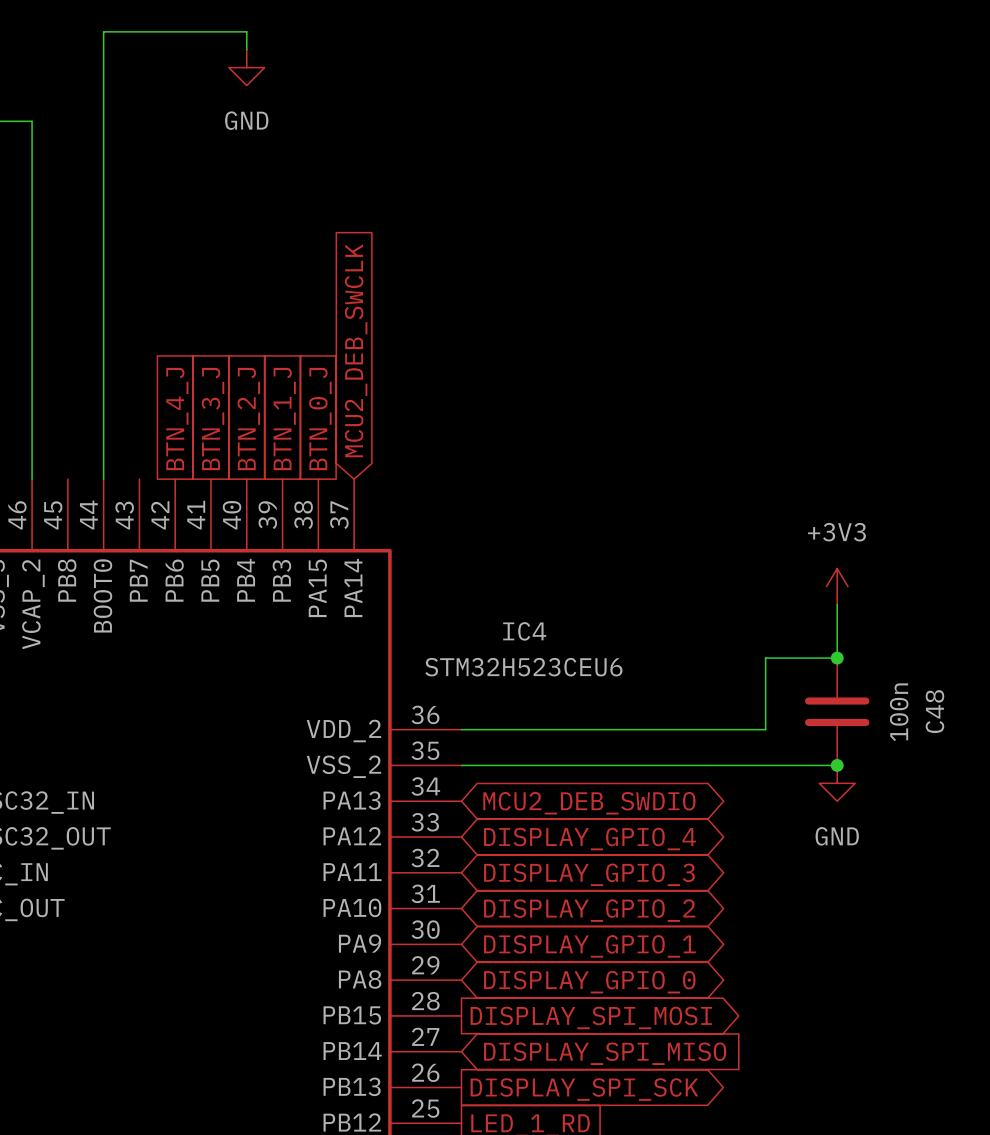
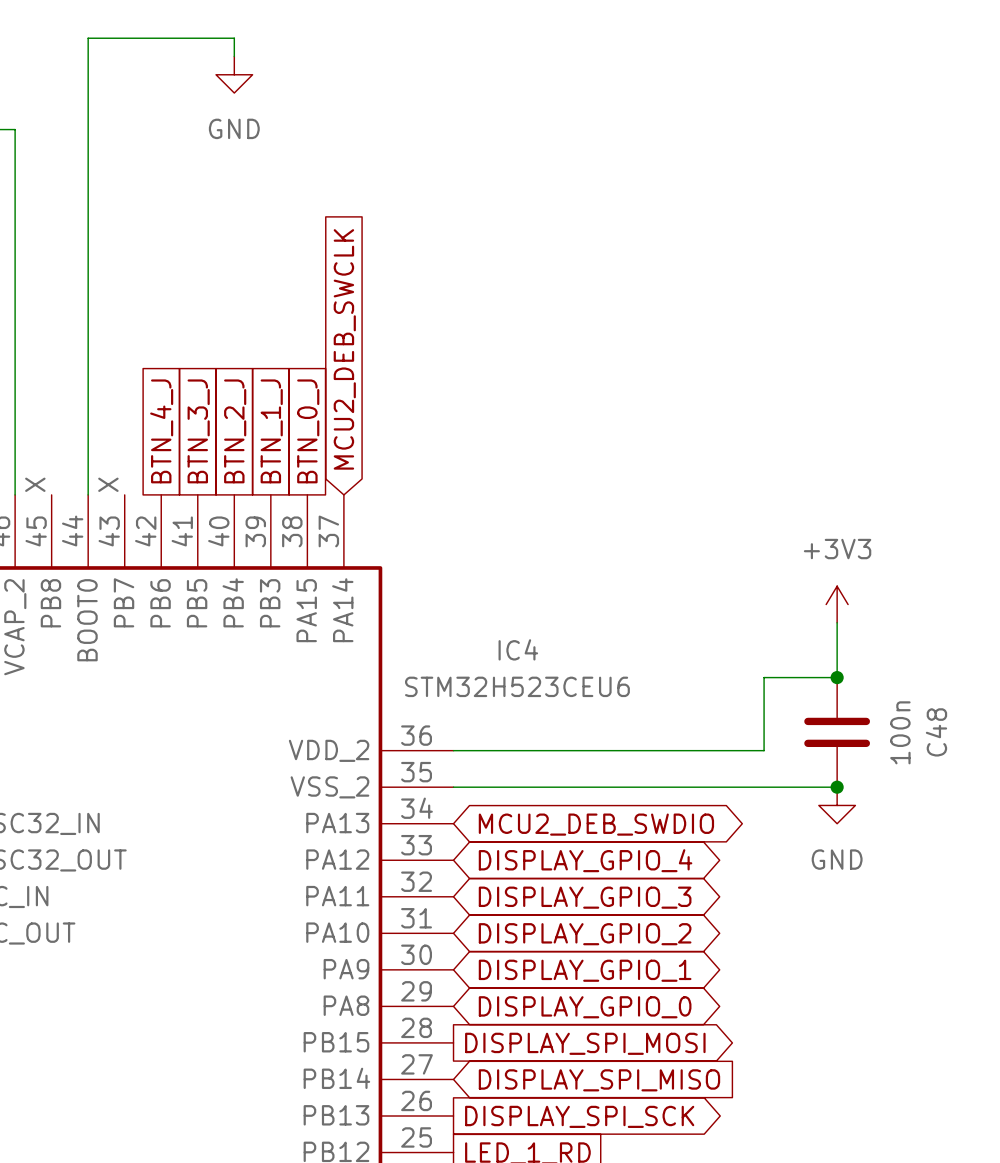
label: none -> X (35, 484)
label: none -> X (108, 484)

